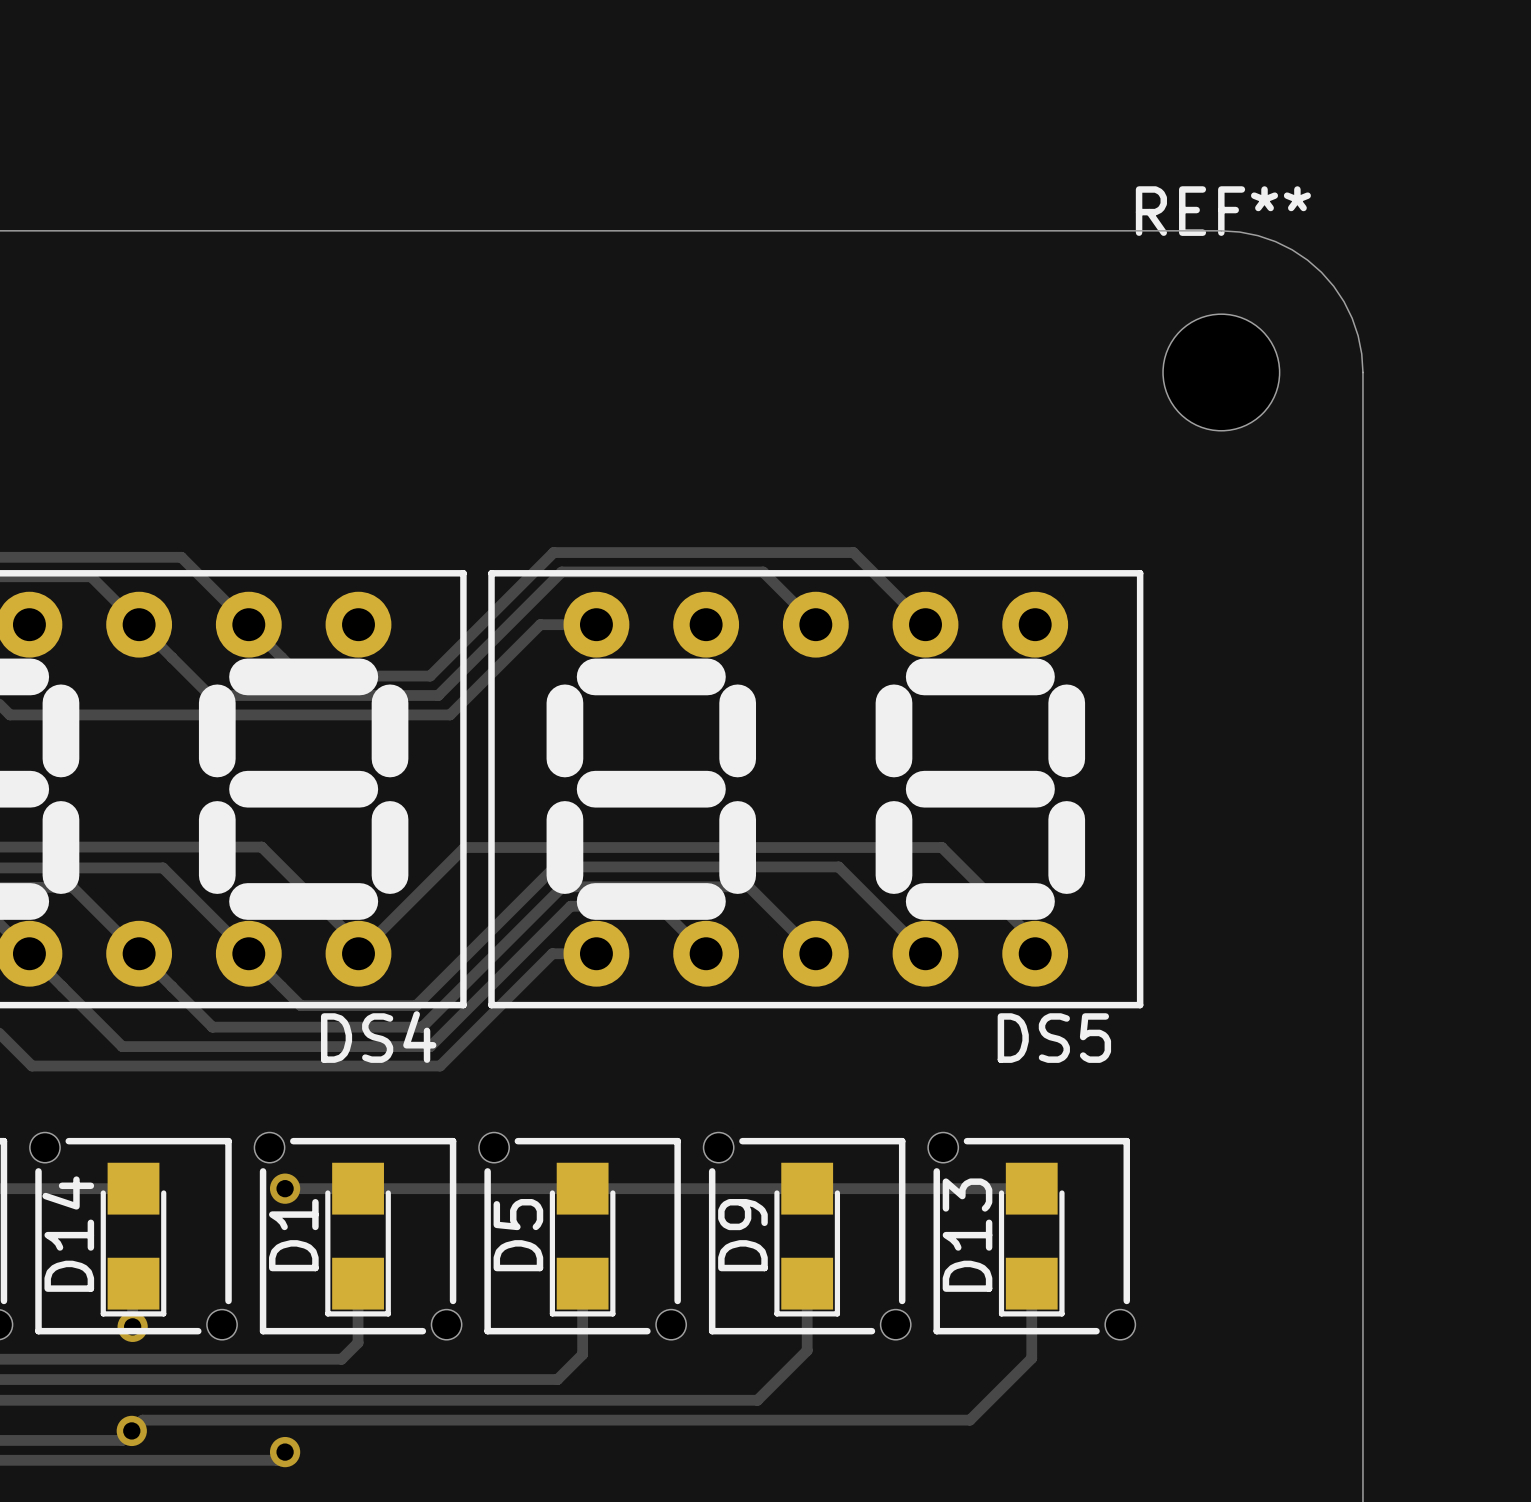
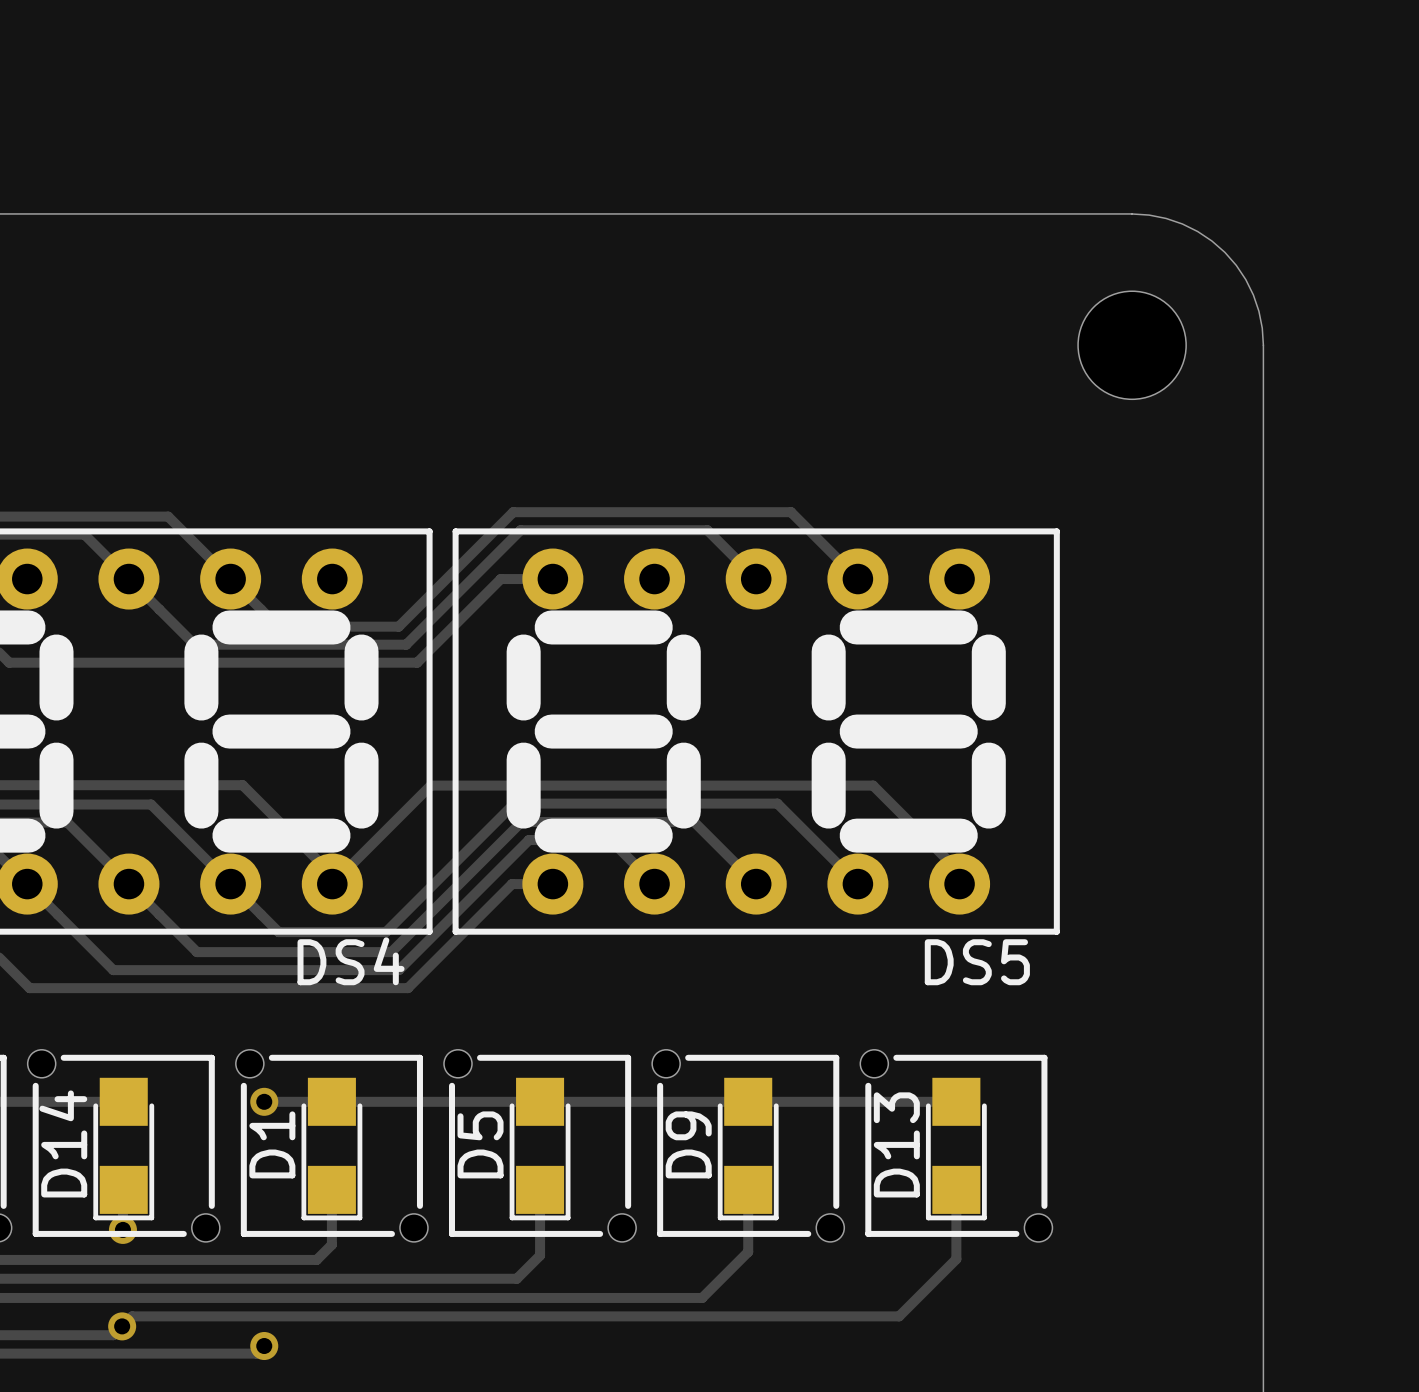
REF** name: REF** (1223, 211) -> none

